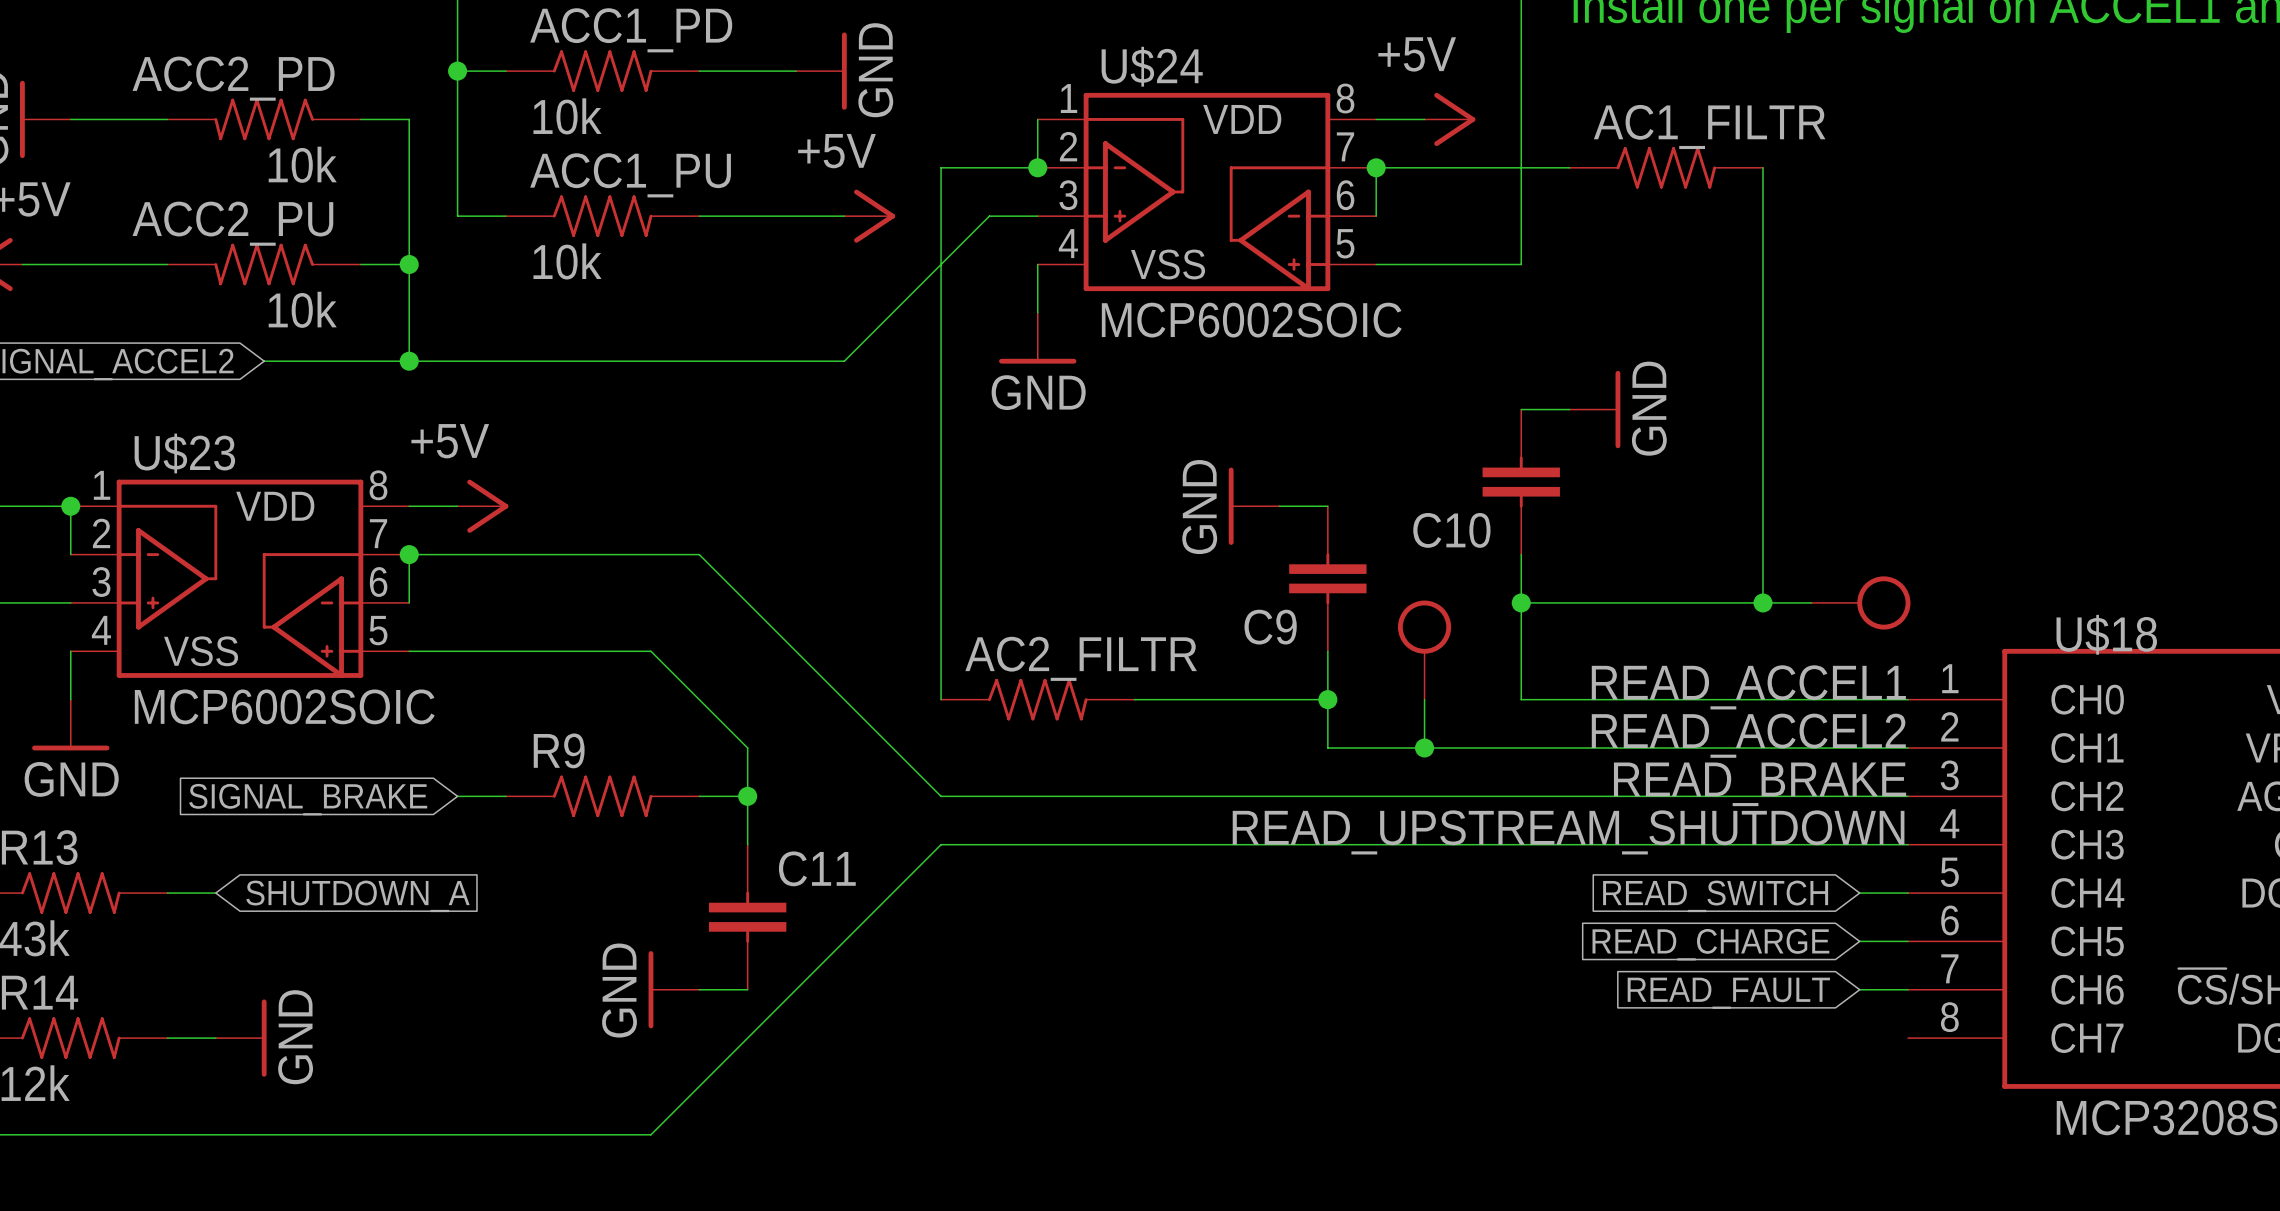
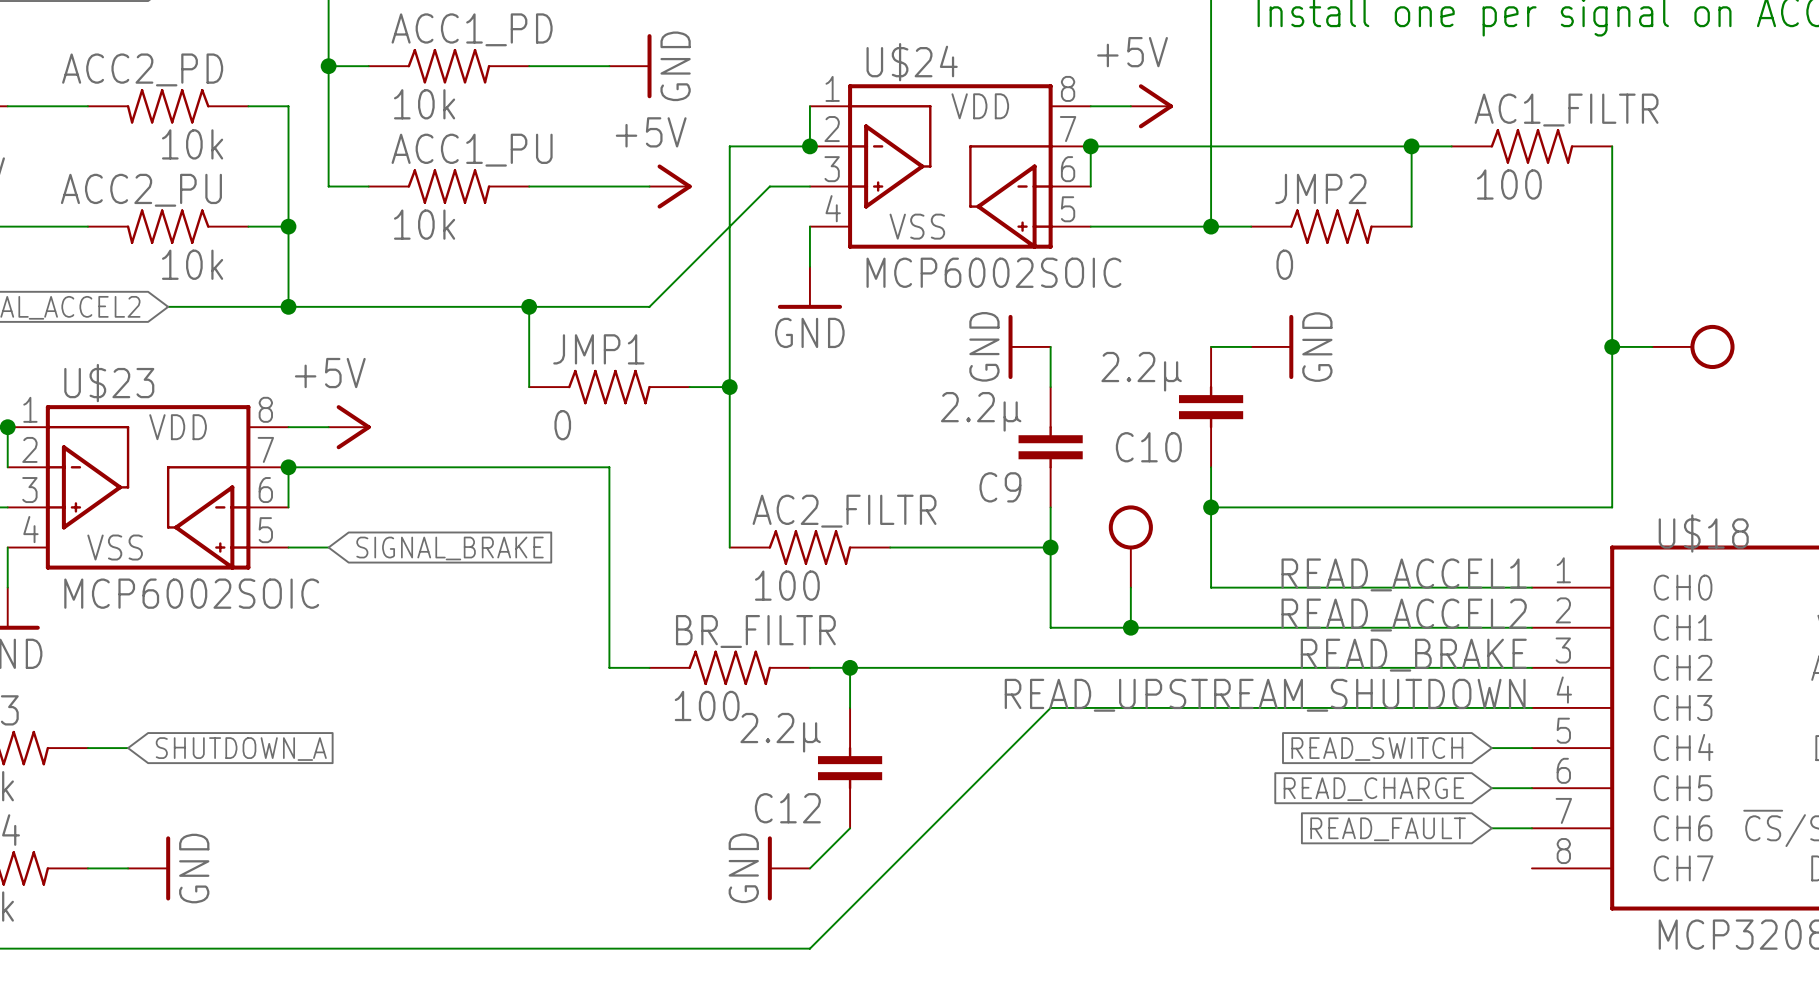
wire: none -> (1251, 146) (1451, 146)
AC1_FILTR position: (1666, 167) -> (1531, 146)
junction: none -> (1411, 146)
wire: none -> (1612, 146) (1612, 507) (1451, 507)
AC1_FILTR value: none -> 100 (1509, 184)
junction: none -> (1211, 226)
JMP2: none -> 0 (1331, 226)
wire: (1762, 264) (1762, 602) -> none
wire: none -> (529, 306) (529, 387)
junction: none -> (529, 306)
wire: none -> (1050, 346) (1050, 387)
wire: none -> (1612, 346) (1652, 346)
junction: none -> (1612, 346)
C10 value: none -> 2.2µ (1141, 371)
JMP1: none -> 0 (609, 387)
junction: none -> (729, 387)
C9 value: none -> 2.2µ (981, 411)
power symbol position: GND (1254, 506) -> GND (1029, 346)
wire: (1279, 506) (1327, 506) -> (1211, 226) (1251, 226)
wire: (699, 554) (941, 796) (1037, 796) -> (529, 467) (609, 467) (609, 667) (649, 667)
C9 position: (1327, 578) -> (1050, 447)
wire: none -> (1050, 507) (1050, 547) (890, 547)
junction: (1762, 602) -> none
part position: (1860, 602) -> (1693, 346)
wire: (457, 651) (650, 651) (747, 748) (747, 844) -> none
wire: (941, 651) (941, 699) -> (850, 667) (850, 707)
AC2_FILTR value: none -> 100 (787, 585)
AC2_FILTR position: (1037, 699) -> (809, 547)
wire: (1134, 699) (1327, 699) -> none
junction position: (1327, 699) -> (1050, 547)
wire: (457, 796) (505, 796) -> none
R9: (602, 796) -> none
wire: (699, 796) (747, 796) -> (689, 387) (729, 387)
junction: (747, 796) -> none
BR_FILTR: none -> 100 (729, 667)
junction: none -> (850, 667)
global label rotation: 0° (308, 799) -> 180° (450, 548)
global label position: SIGNAL_BRAKE (308, 799) -> SIGNAL_BRAKE (450, 548)
wire: (1327, 844) (941, 844) (650, 1134) -> (1050, 707) (809, 948) (489, 948)
C11: (747, 917) -> none
C12: none -> 2.2µ (850, 768)
power symbol: GND (673, 989) -> none
wire: (699, 989) (747, 989) -> none
wire: none -> (850, 828) (809, 868)
power symbol: none -> GND (788, 868)

